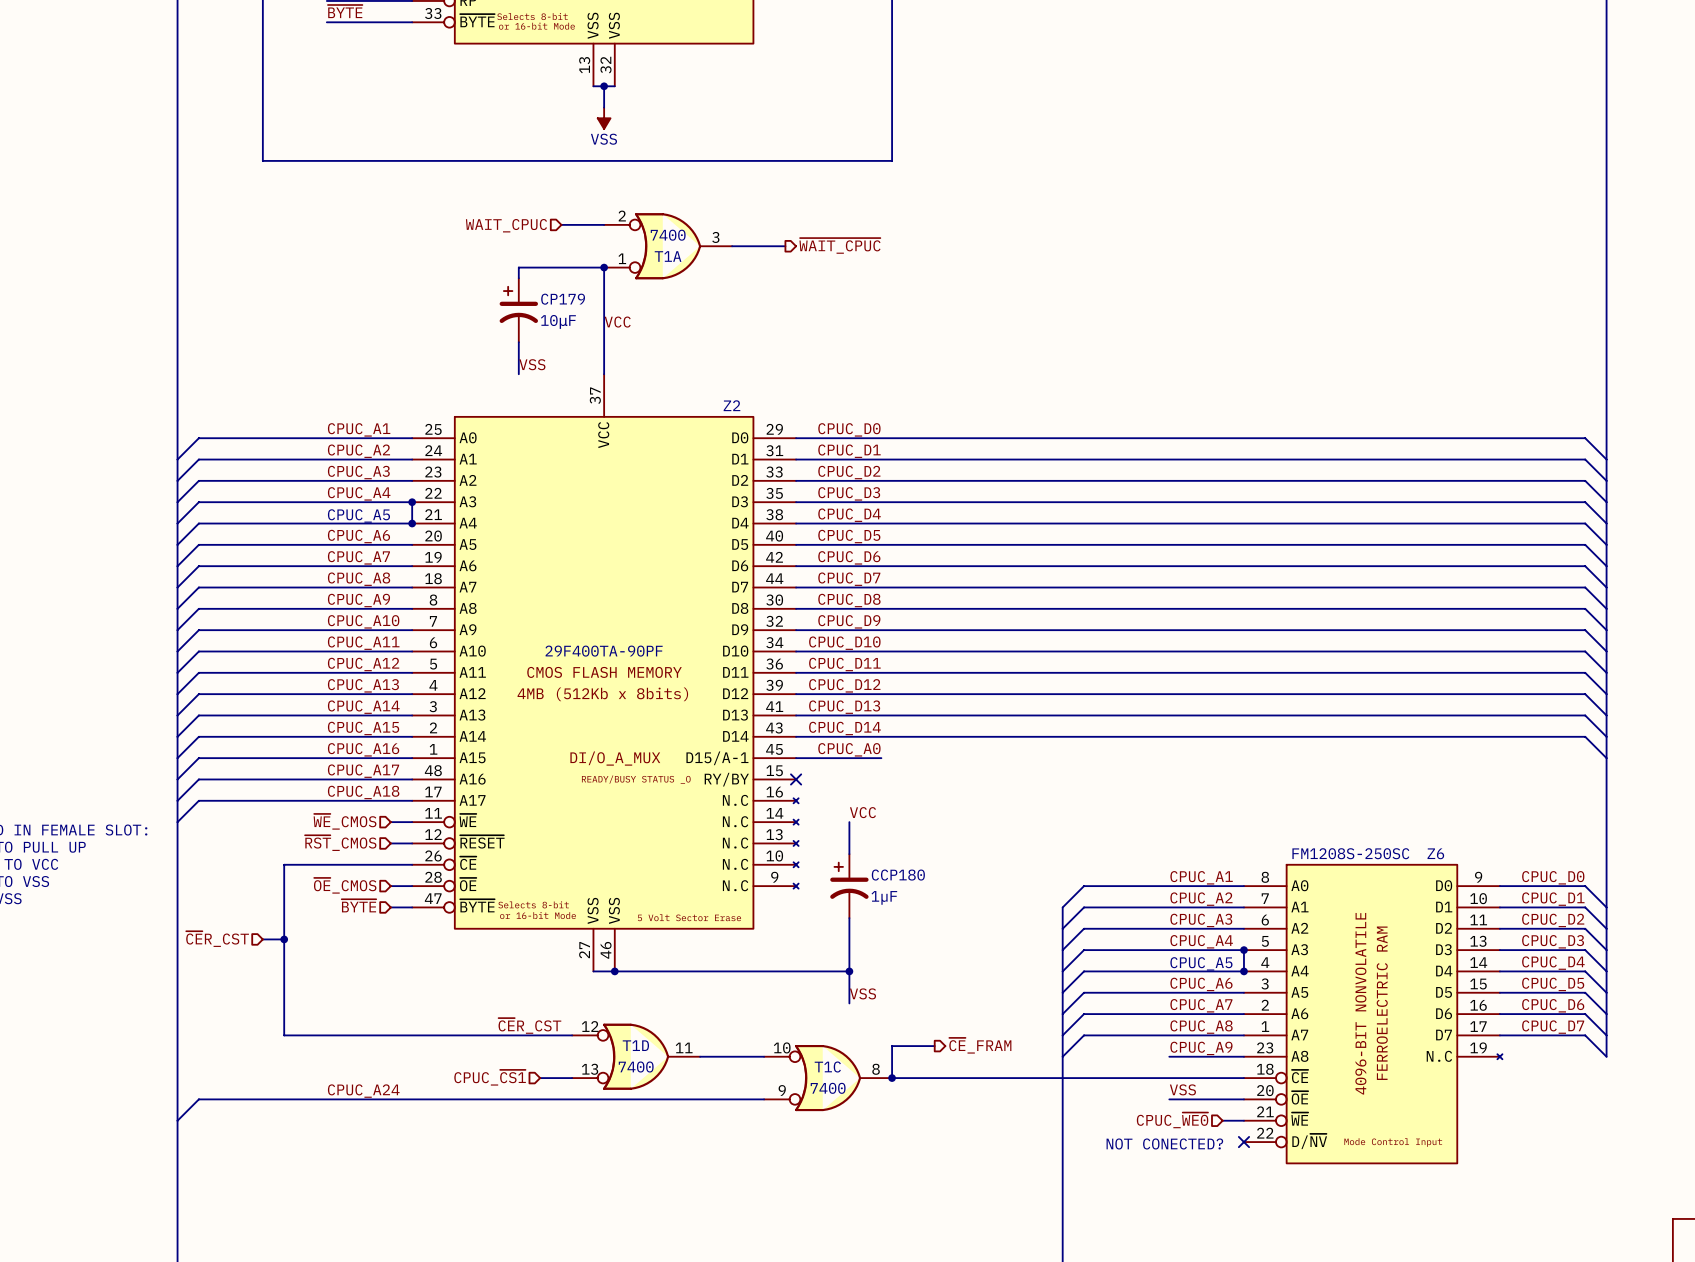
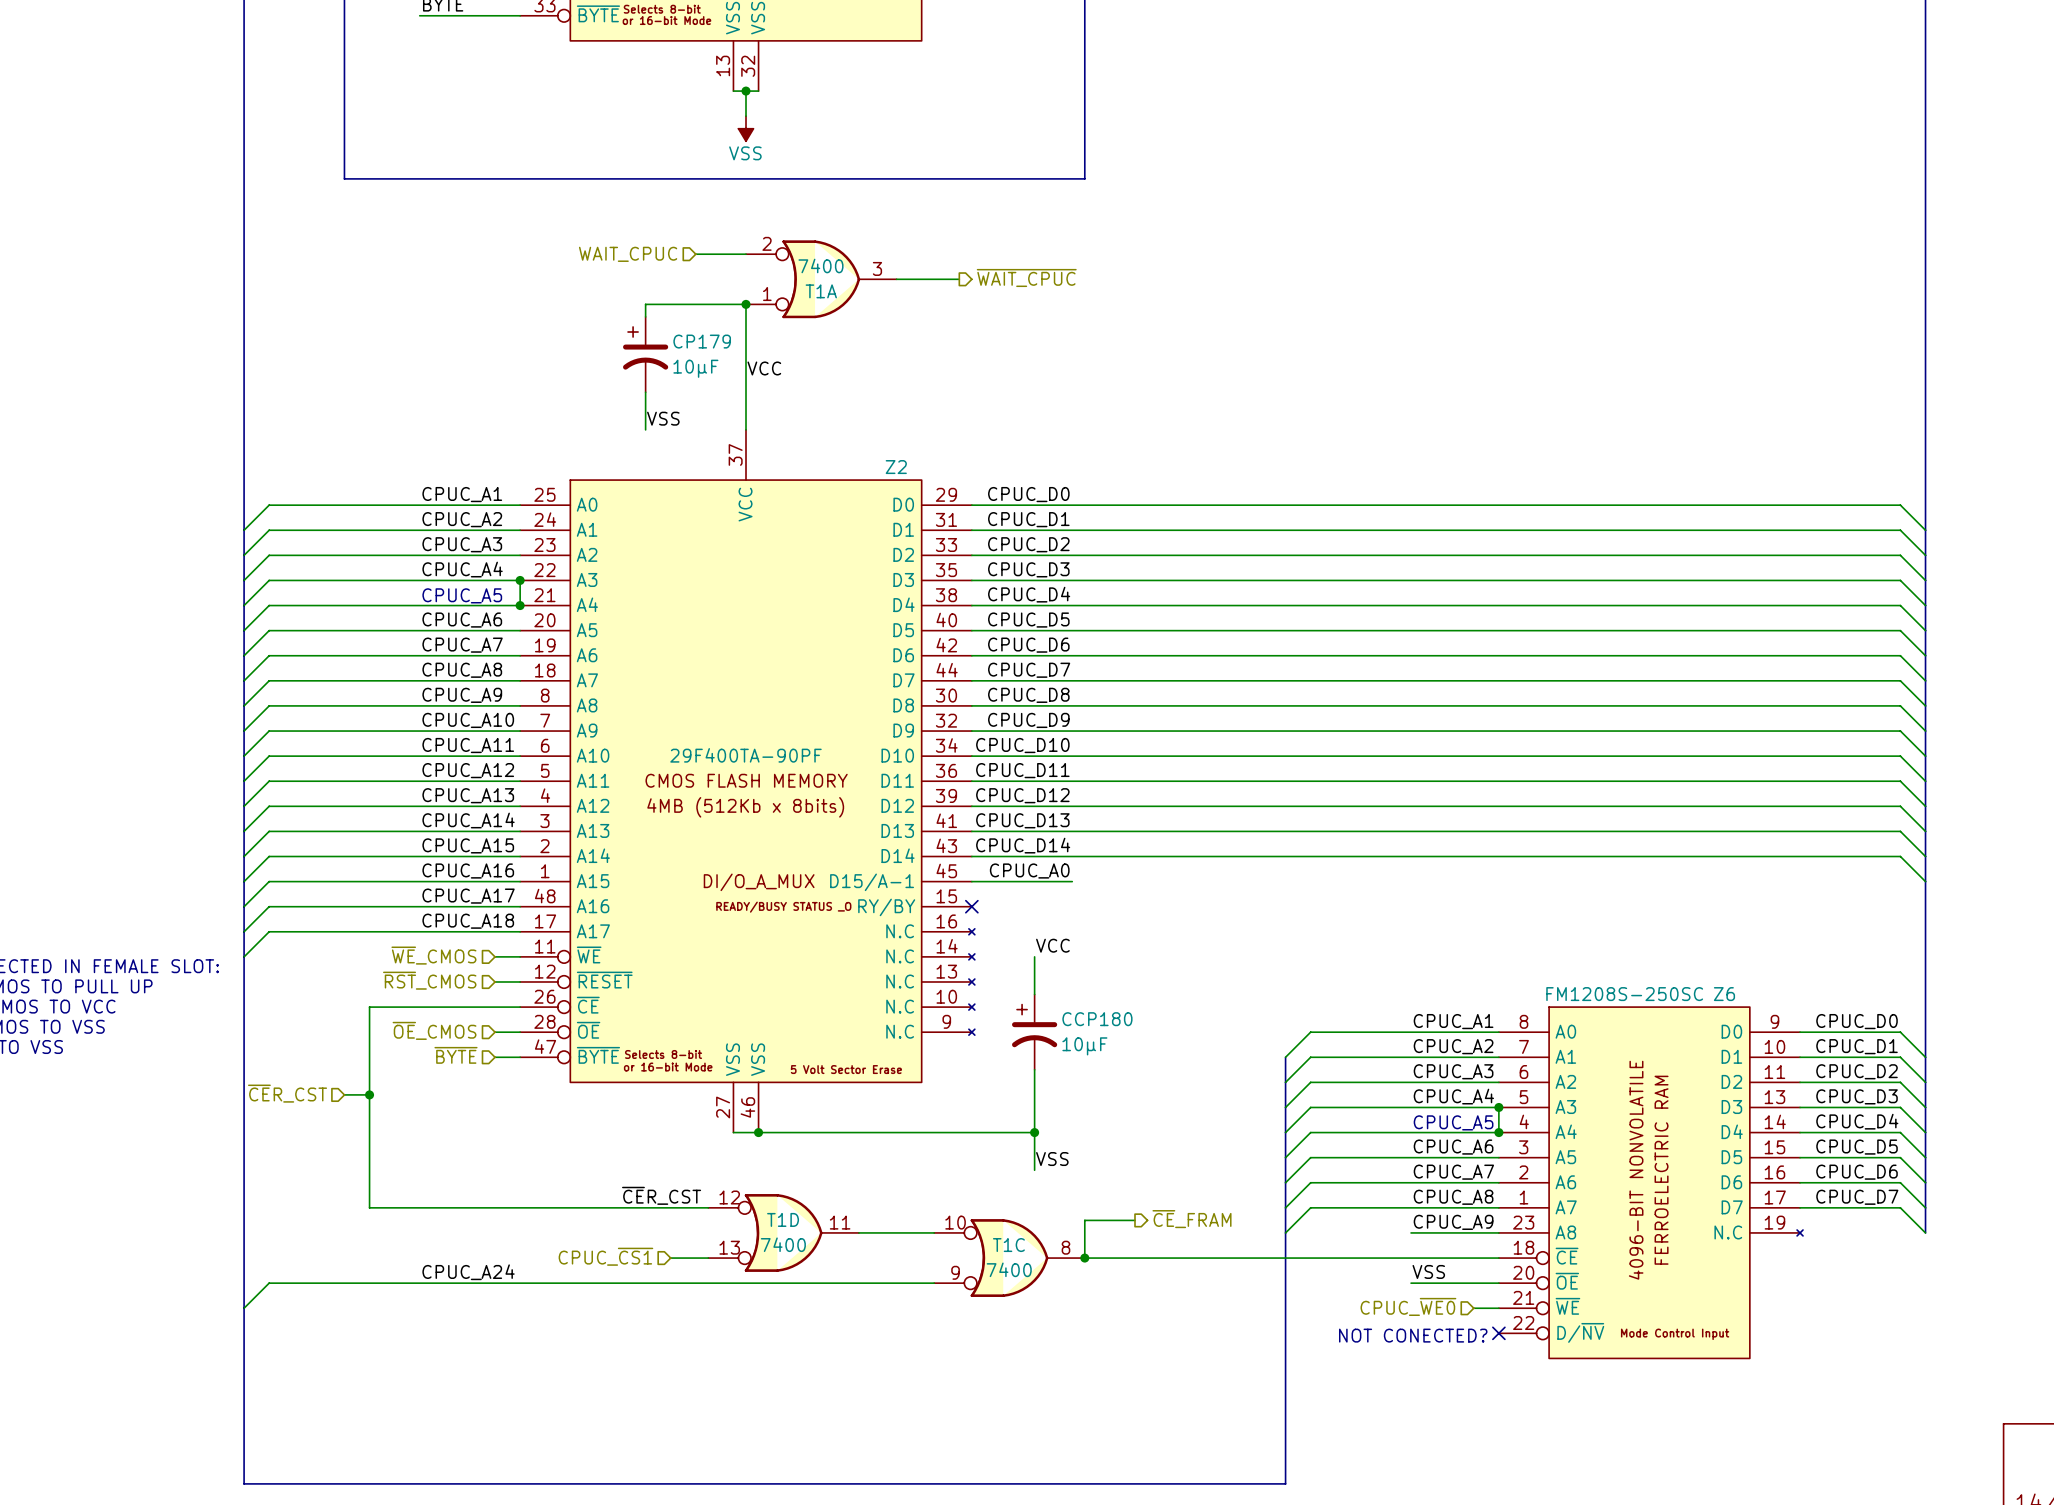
CCP180 value: 1µF (884, 897) -> 10μF (1084, 1046)

